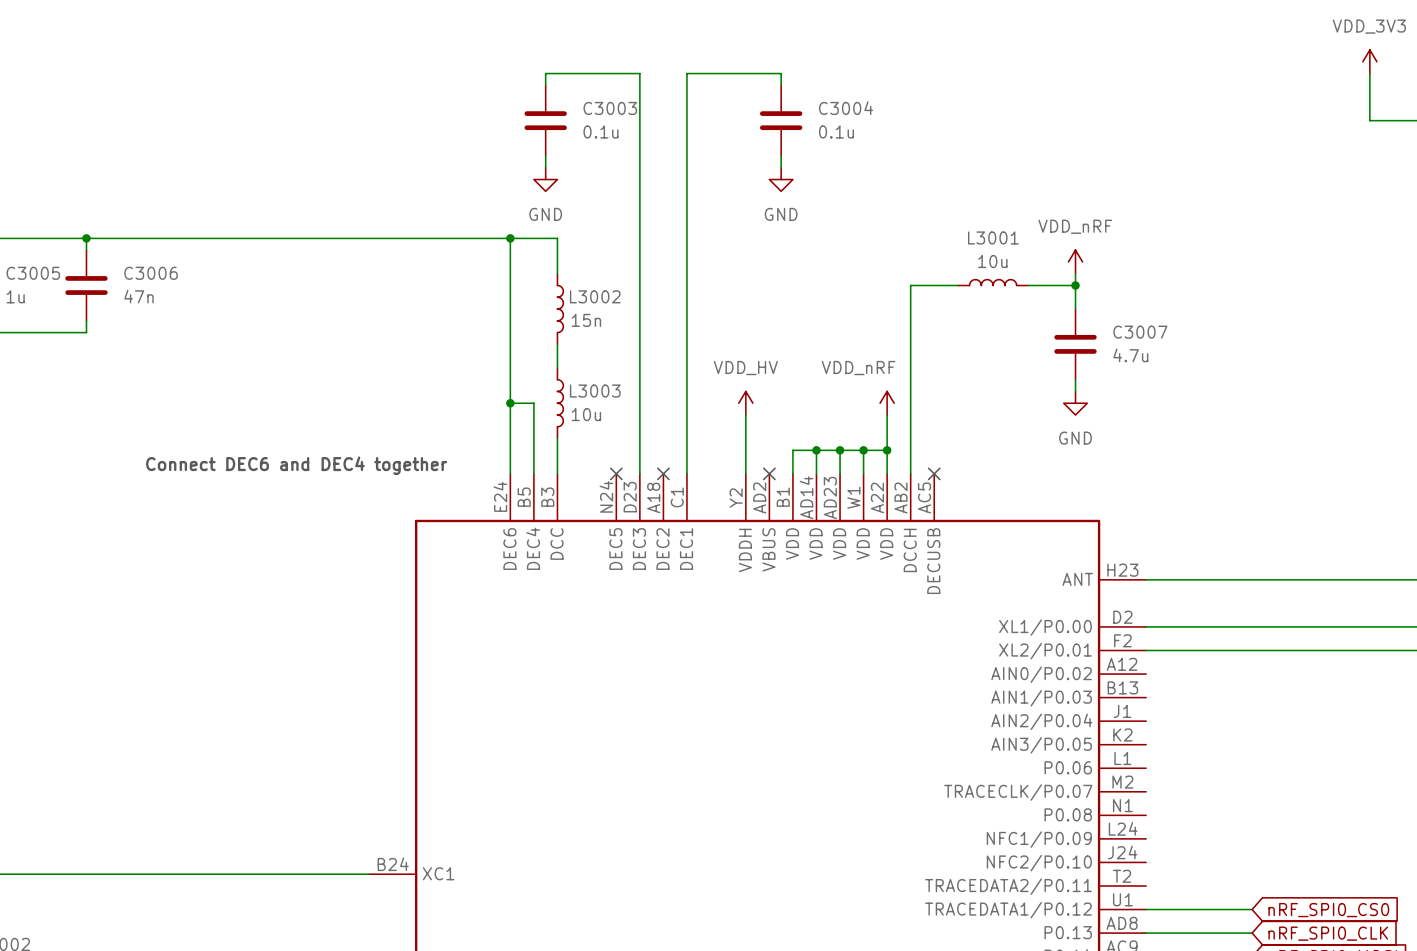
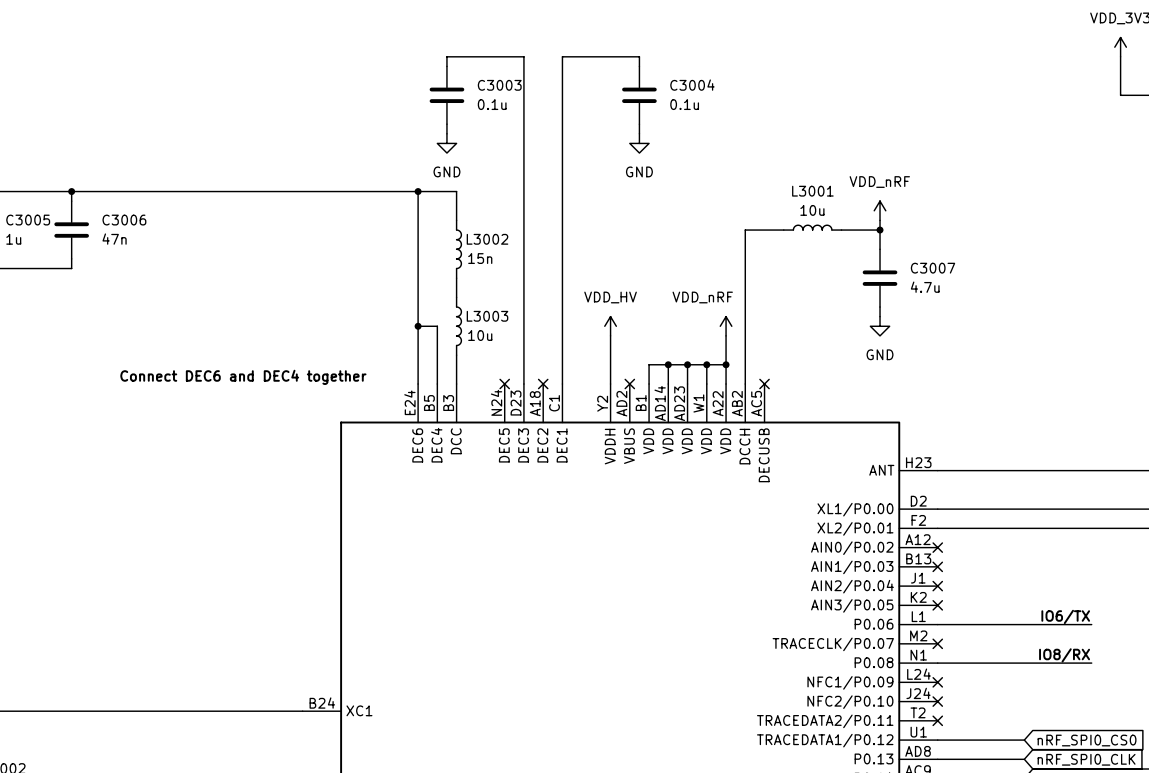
no-connect mark: none -> (937, 547)
no-connect mark: none -> (937, 566)
no-connect mark: none -> (937, 586)
no-connect mark: none -> (937, 605)
label: none -> IO6/TX (1065, 616)
wire: none -> (937, 624) (1091, 624)
no-connect mark: none -> (937, 643)
label: none -> IO8/RX (1064, 655)
wire: none -> (937, 663) (1091, 663)
no-connect mark: none -> (937, 682)
no-connect mark: none -> (937, 701)
no-connect mark: none -> (937, 720)

